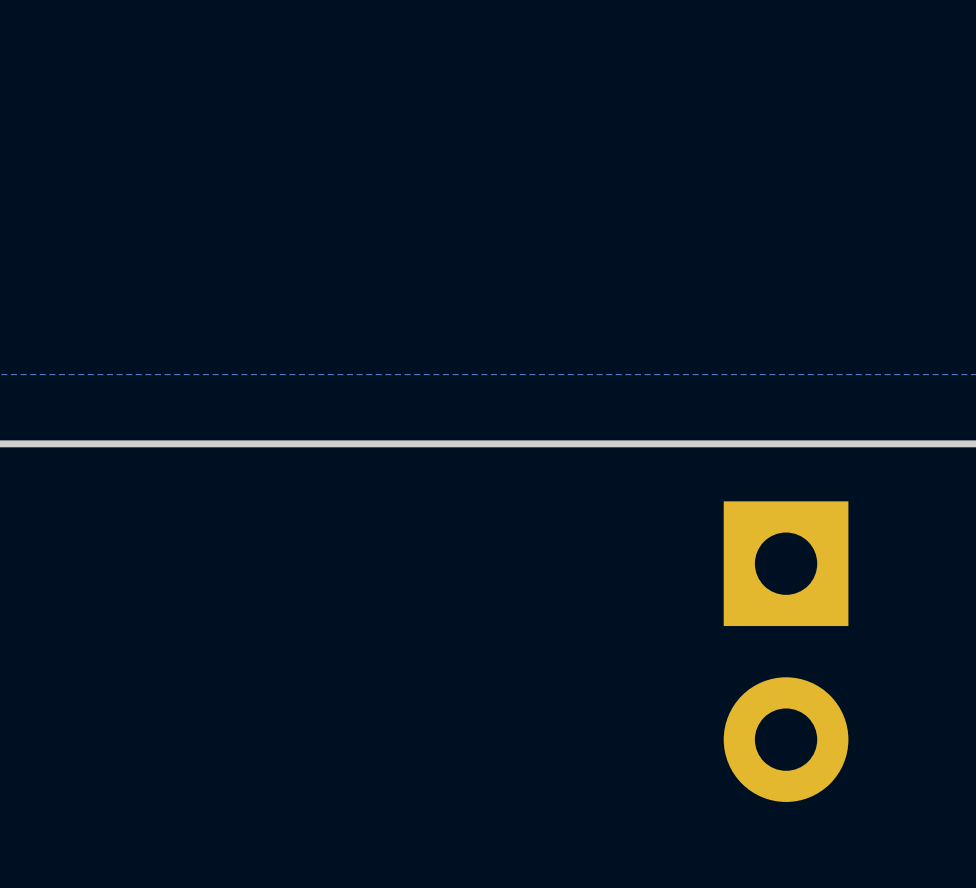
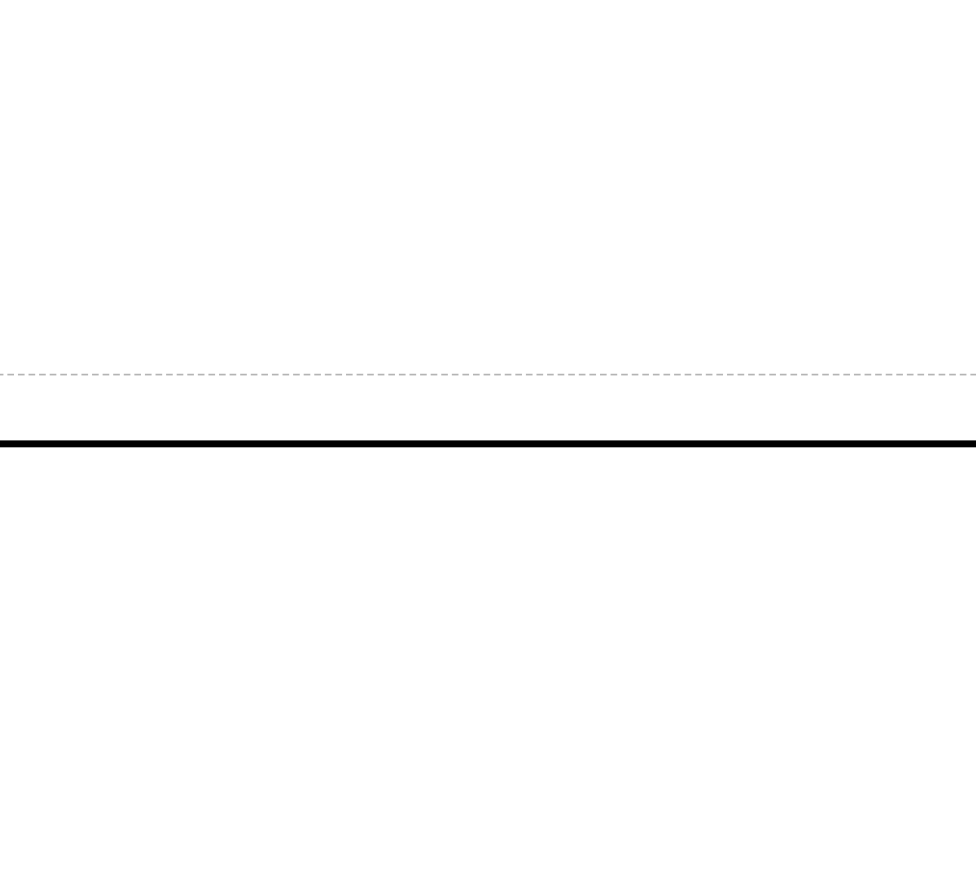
part: (786, 651) -> none

